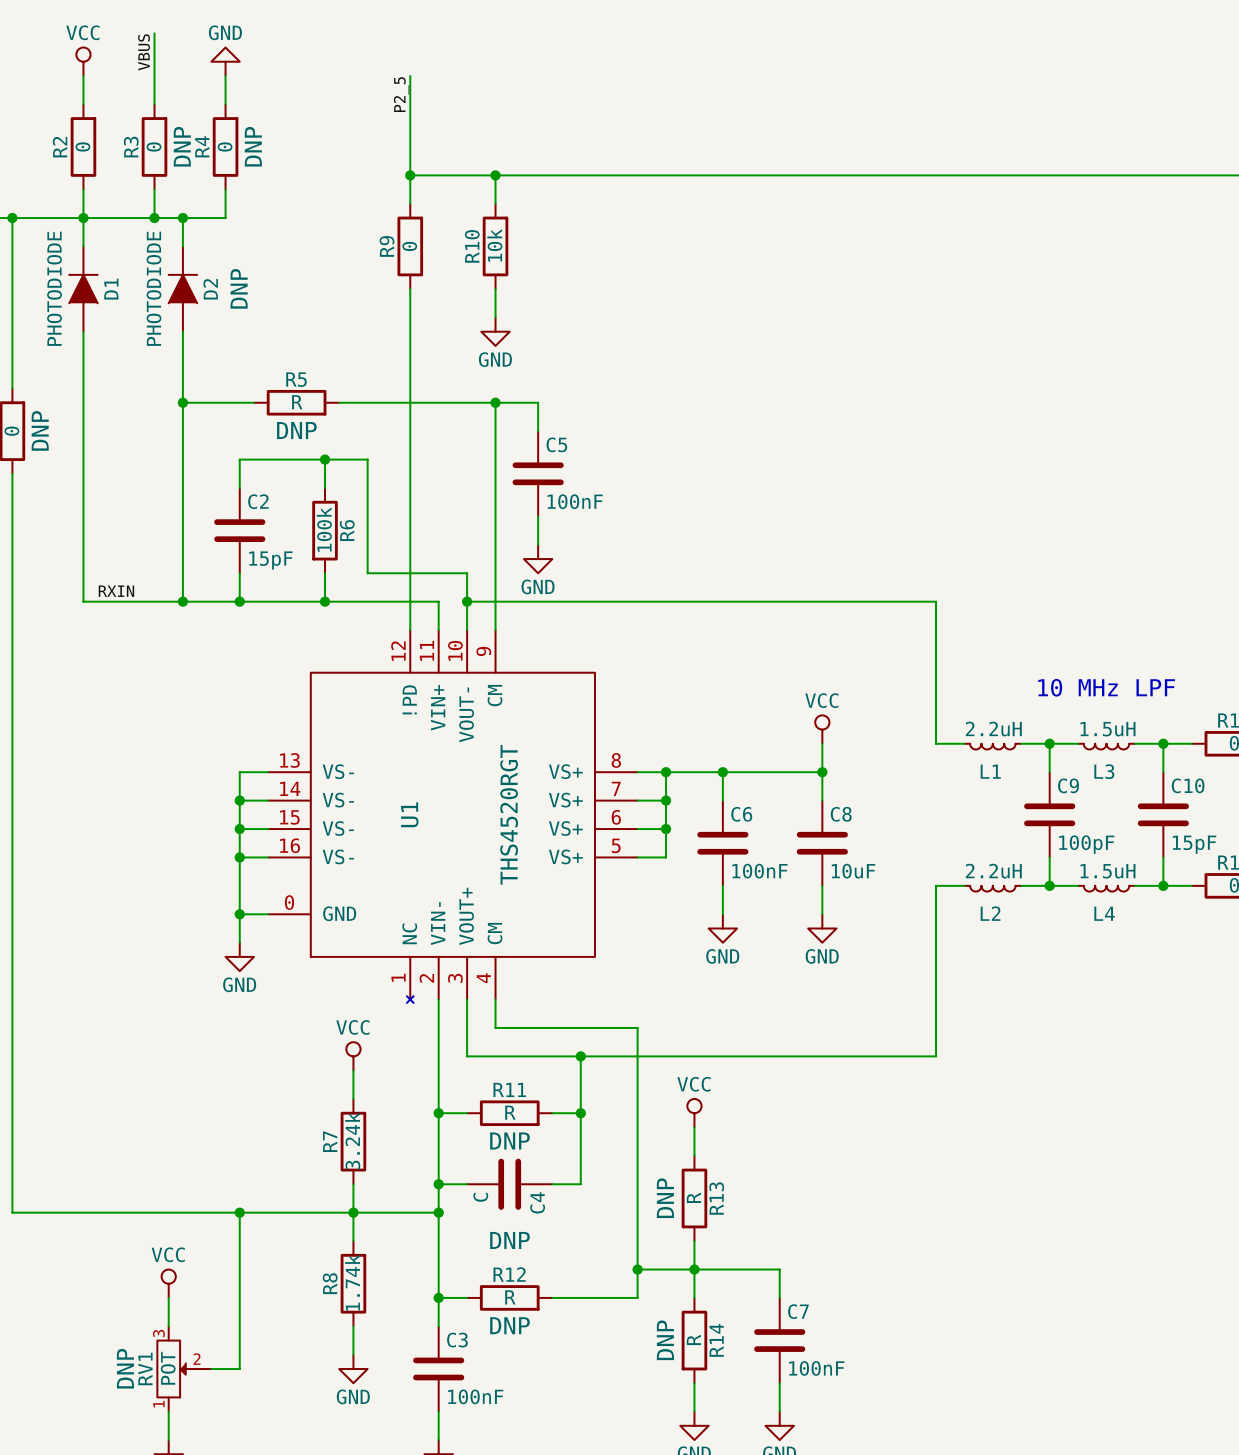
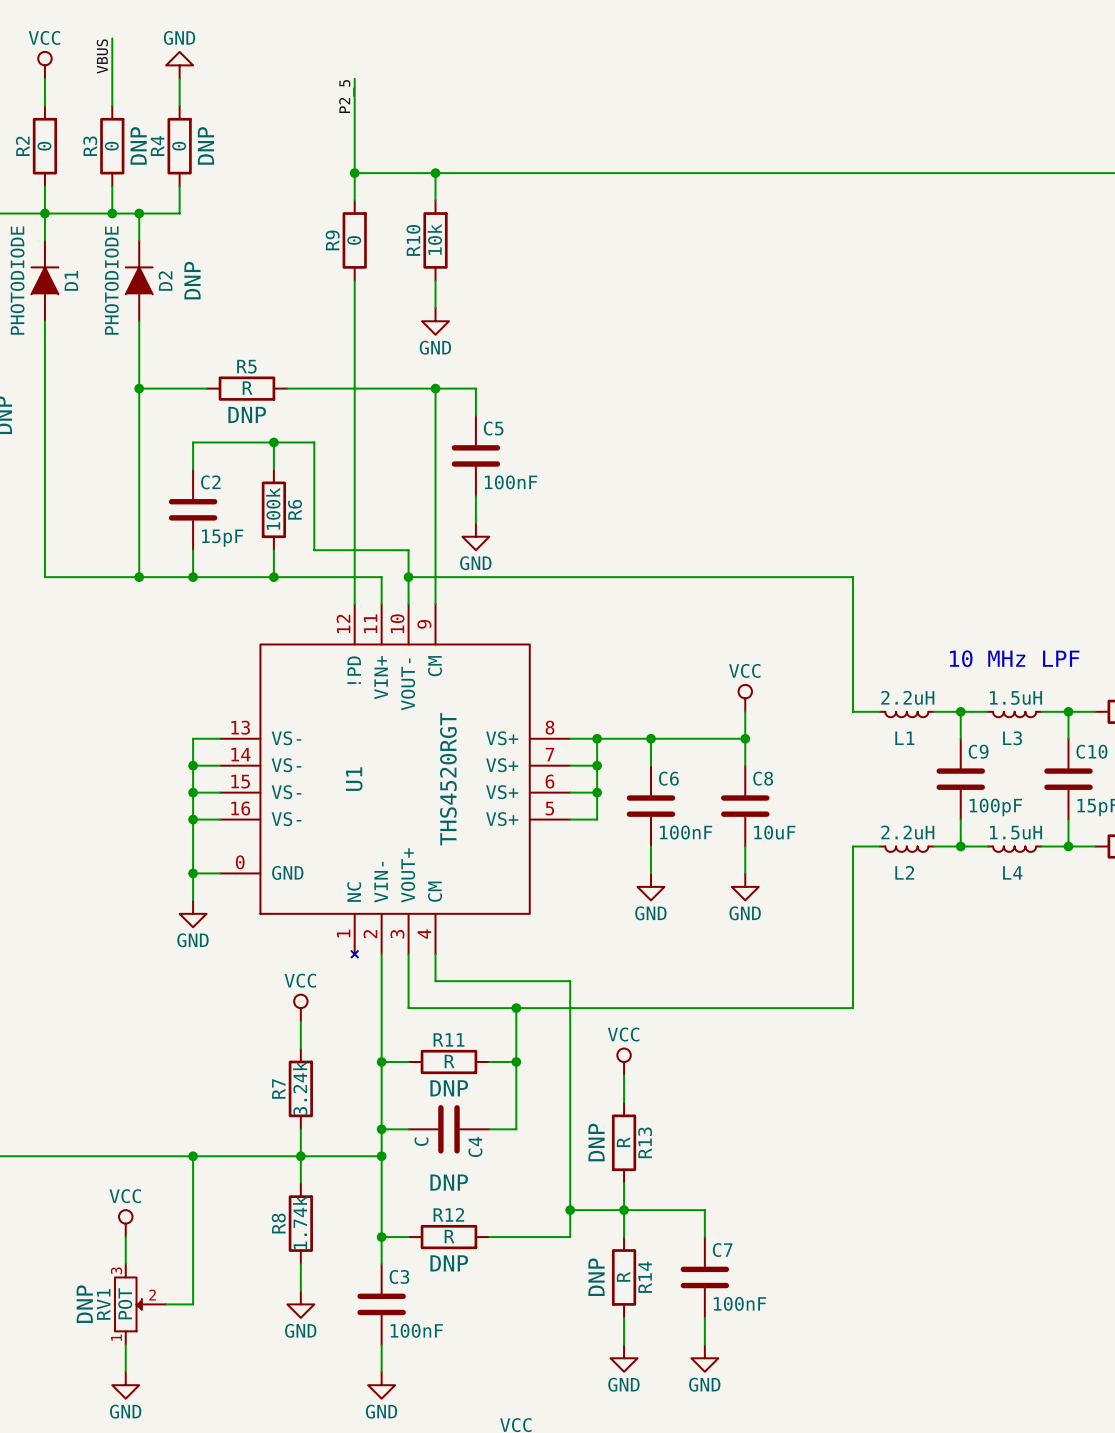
label: RXIN (116, 591) -> none

